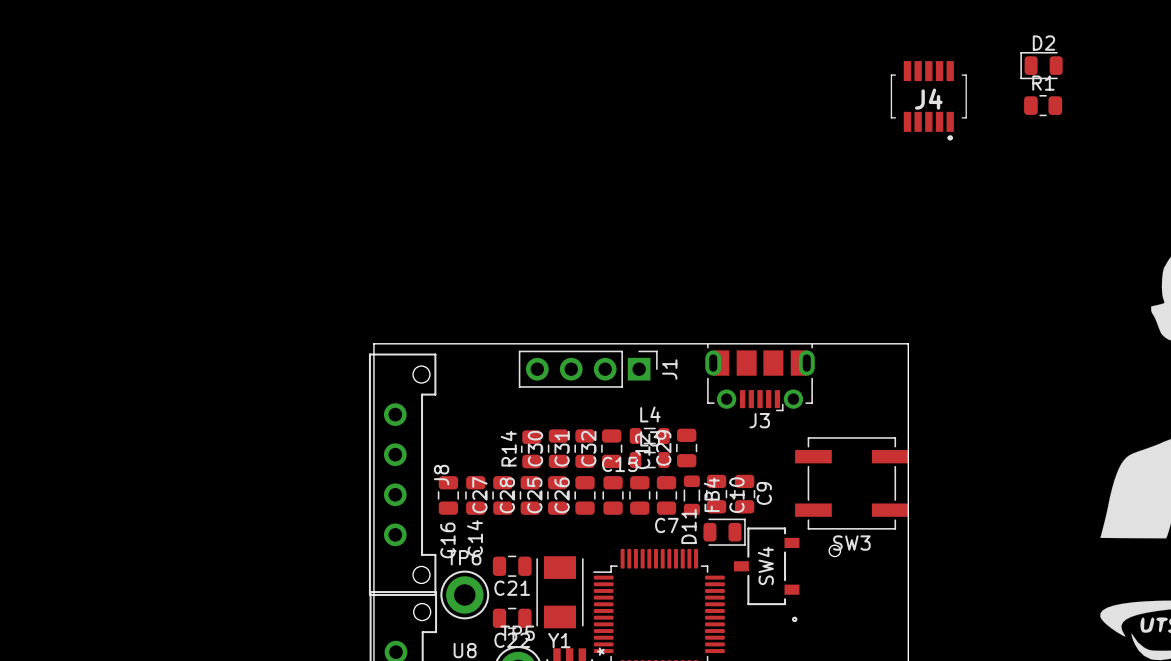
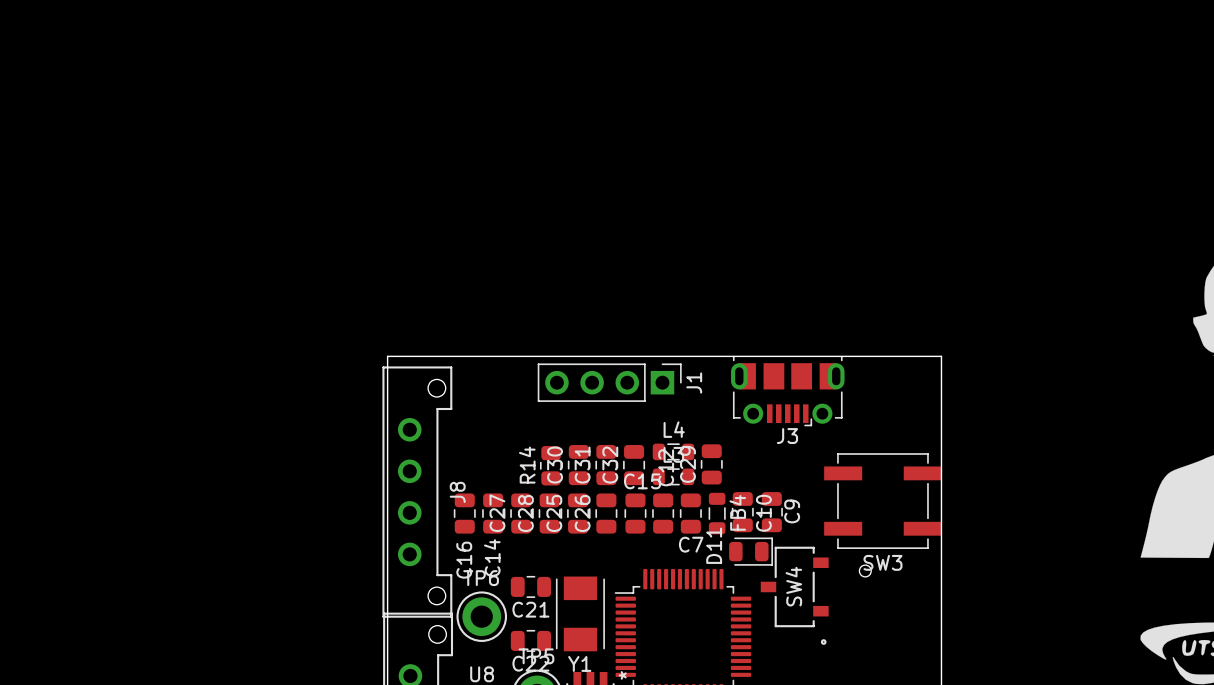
D2: (1041, 65) -> none
J4: (928, 100) -> none
R1: (1043, 105) -> none

